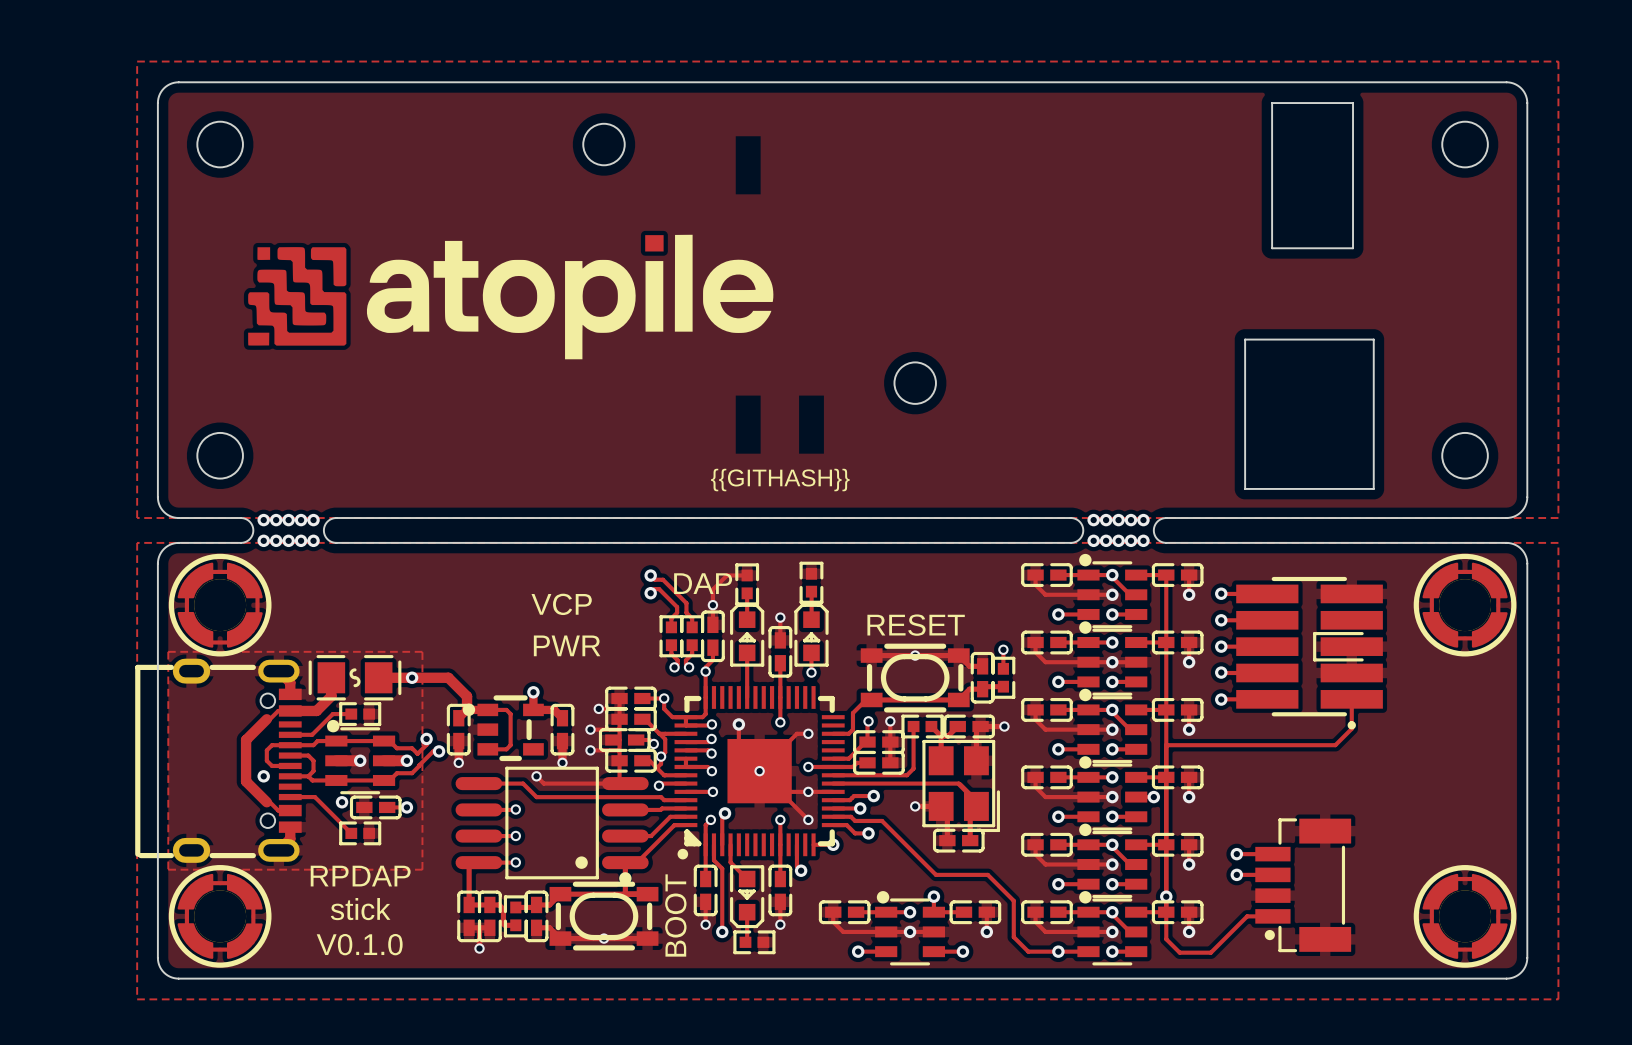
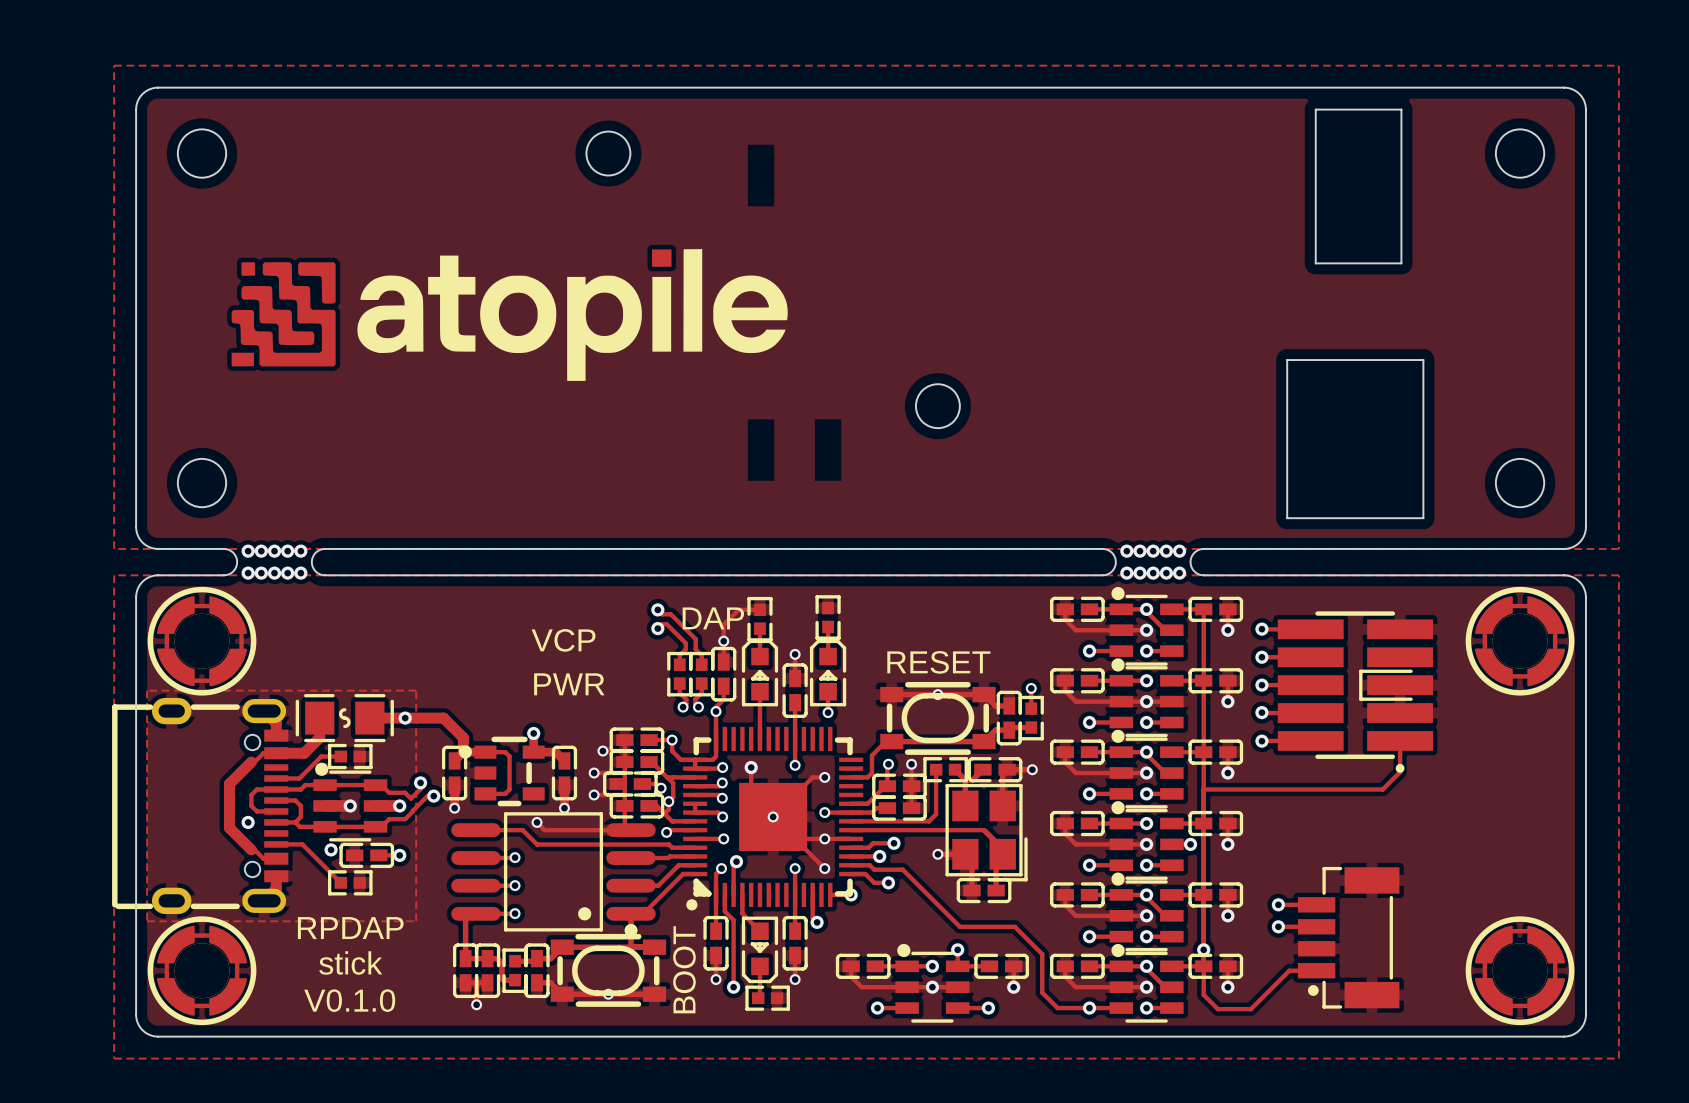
text: {{GITHASH}} (780, 480) -> none

